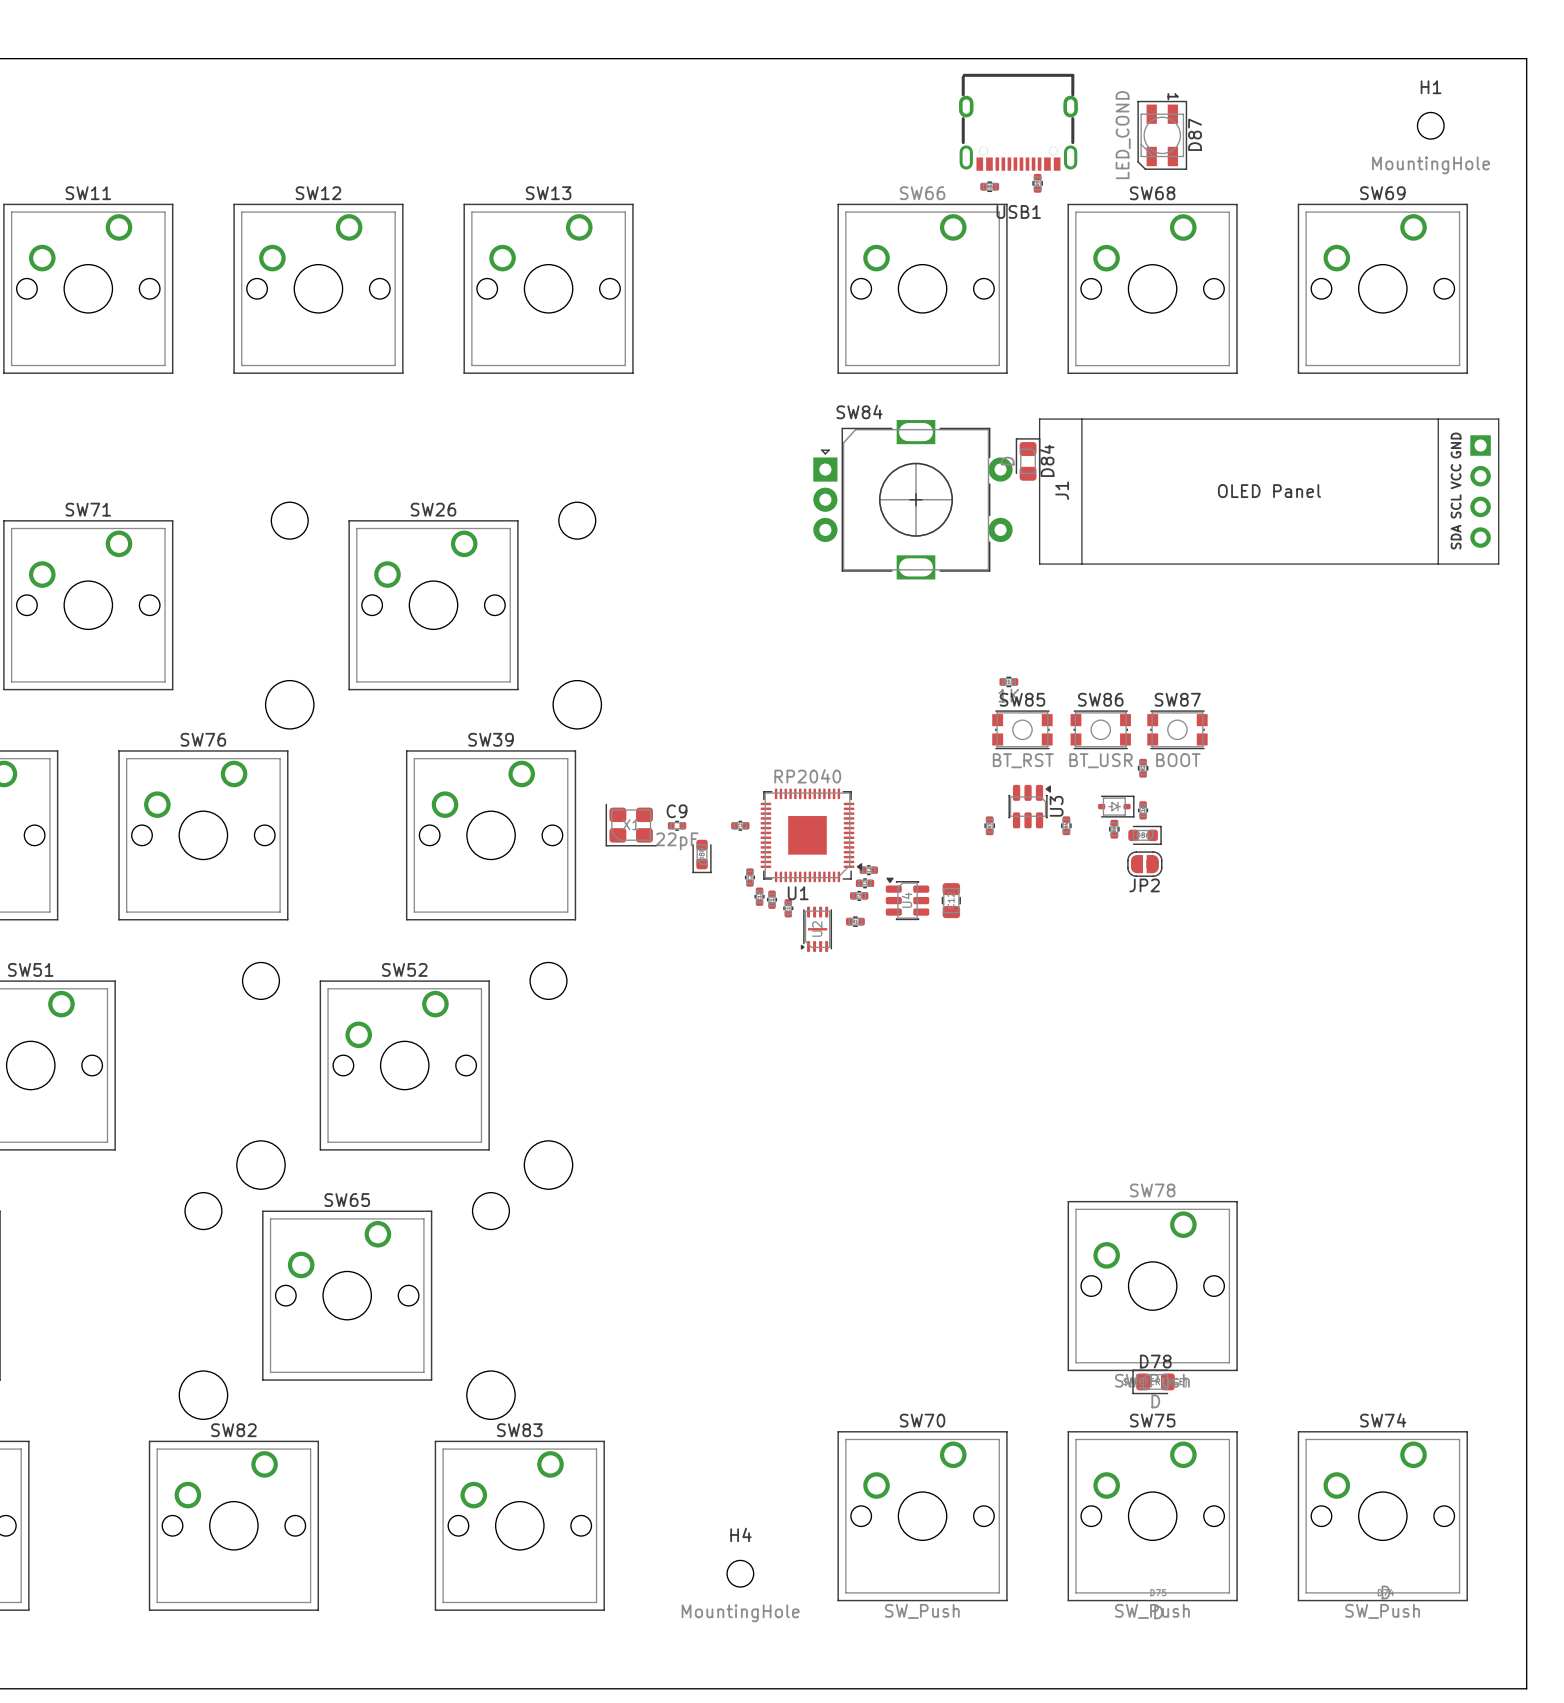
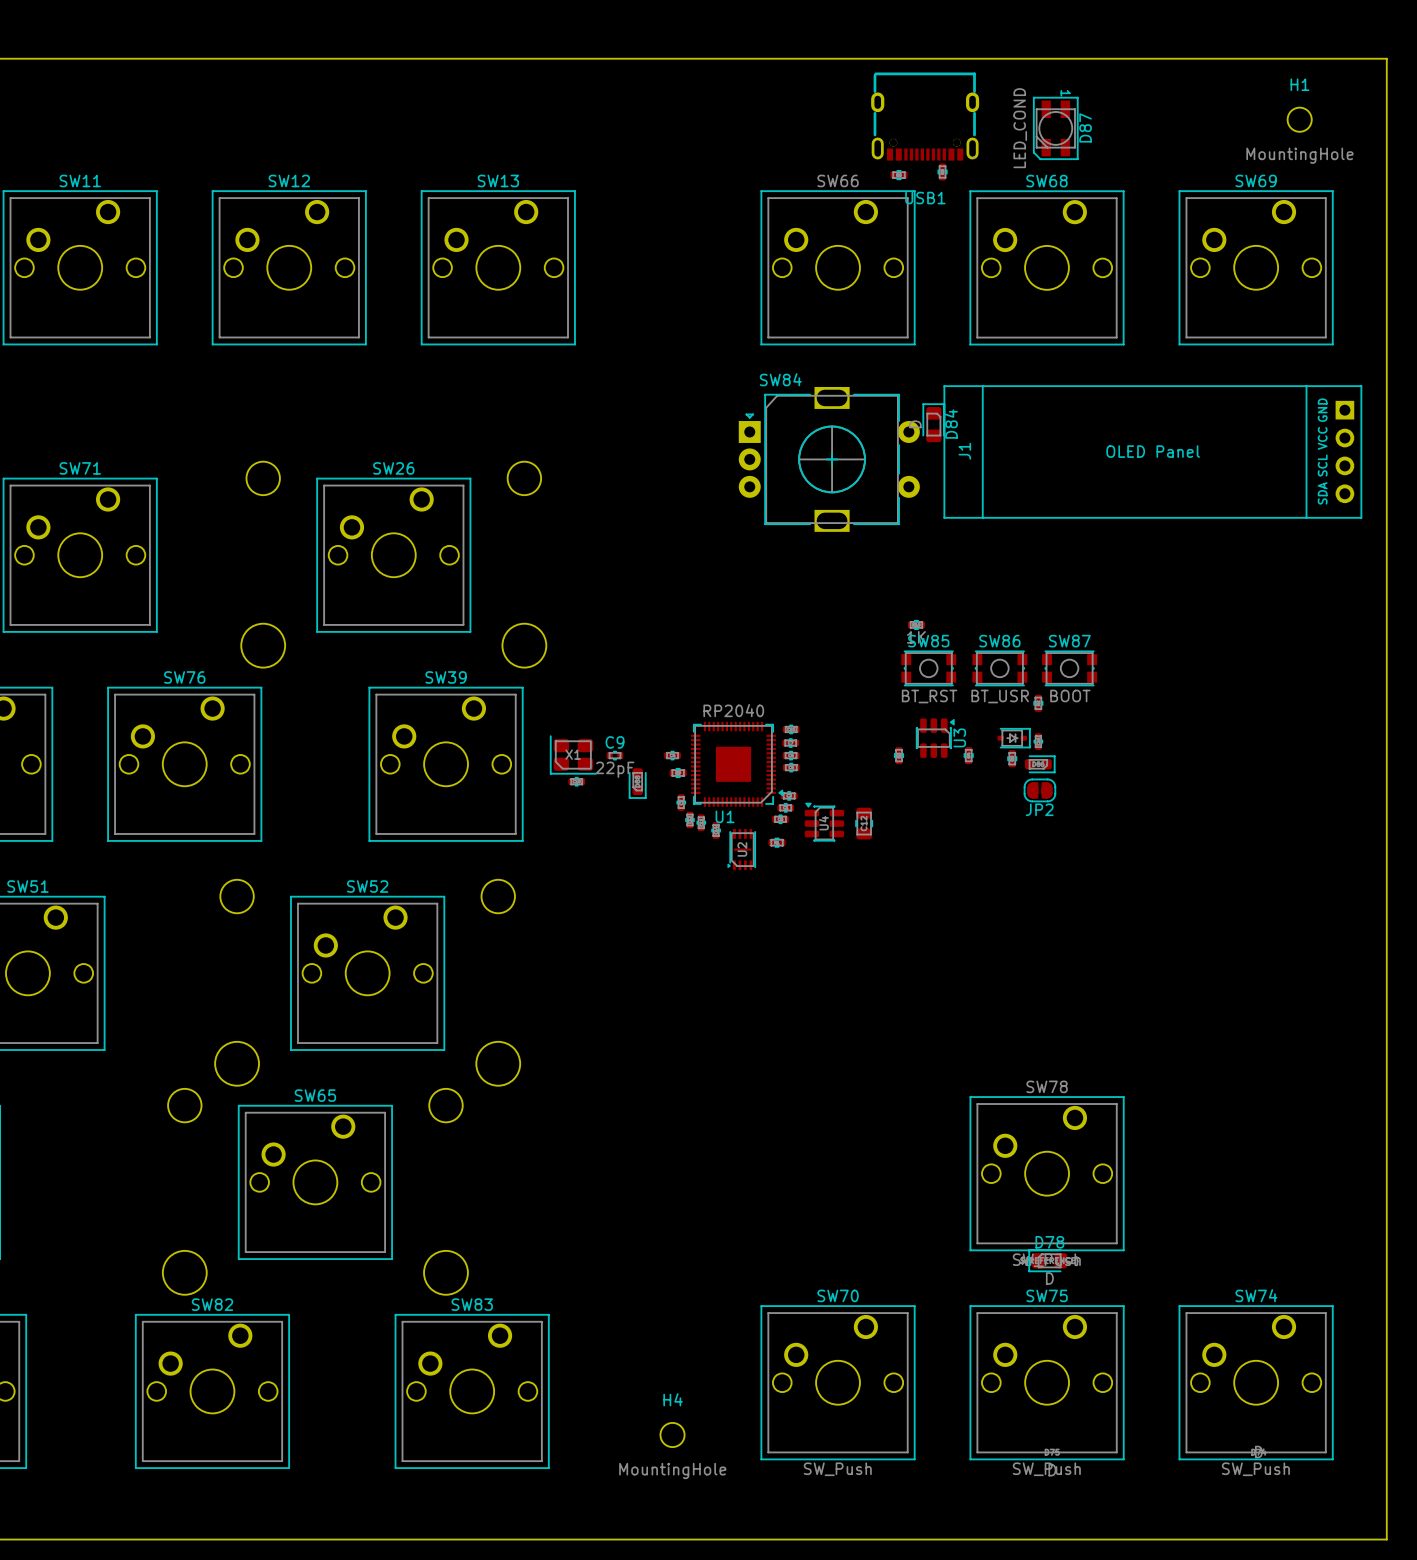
part: none -> (791, 729)
part: none -> (790, 743)
part: none -> (791, 755)
part: none -> (791, 767)
part: none -> (678, 773)
part: none -> (576, 781)

